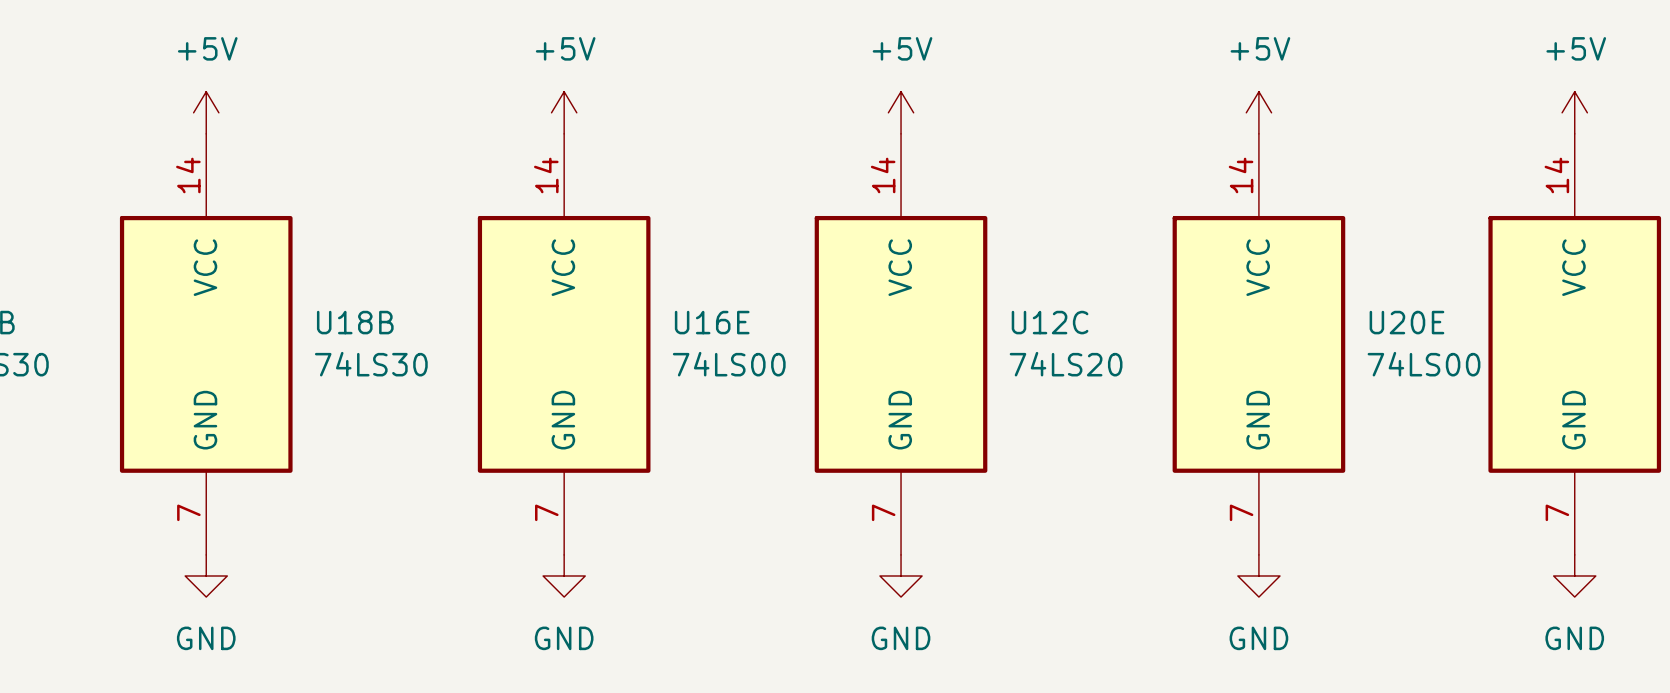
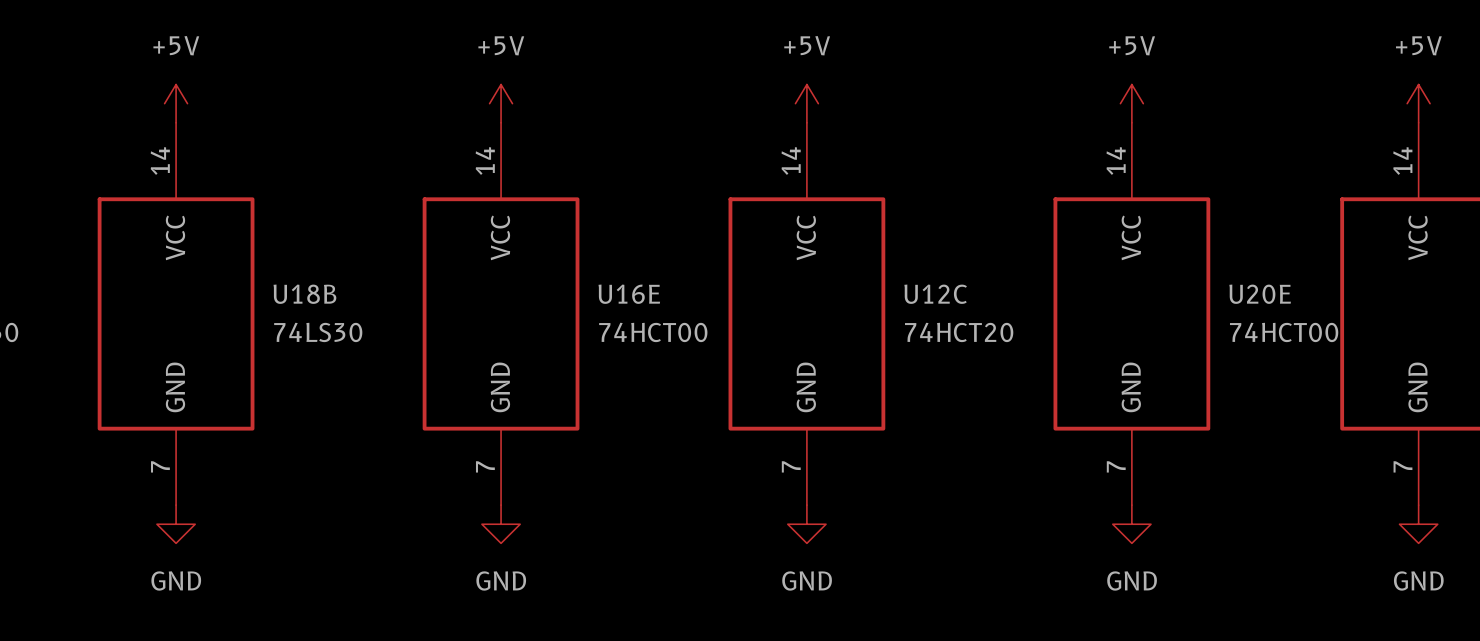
U16E value: 74LS00 (729, 364) -> 74HCT00 (653, 332)
U12C value: 74LS20 (1066, 364) -> 74HCT20 (959, 332)
U20E value: 74LS00 (1424, 364) -> 74HCT00 (1284, 332)

